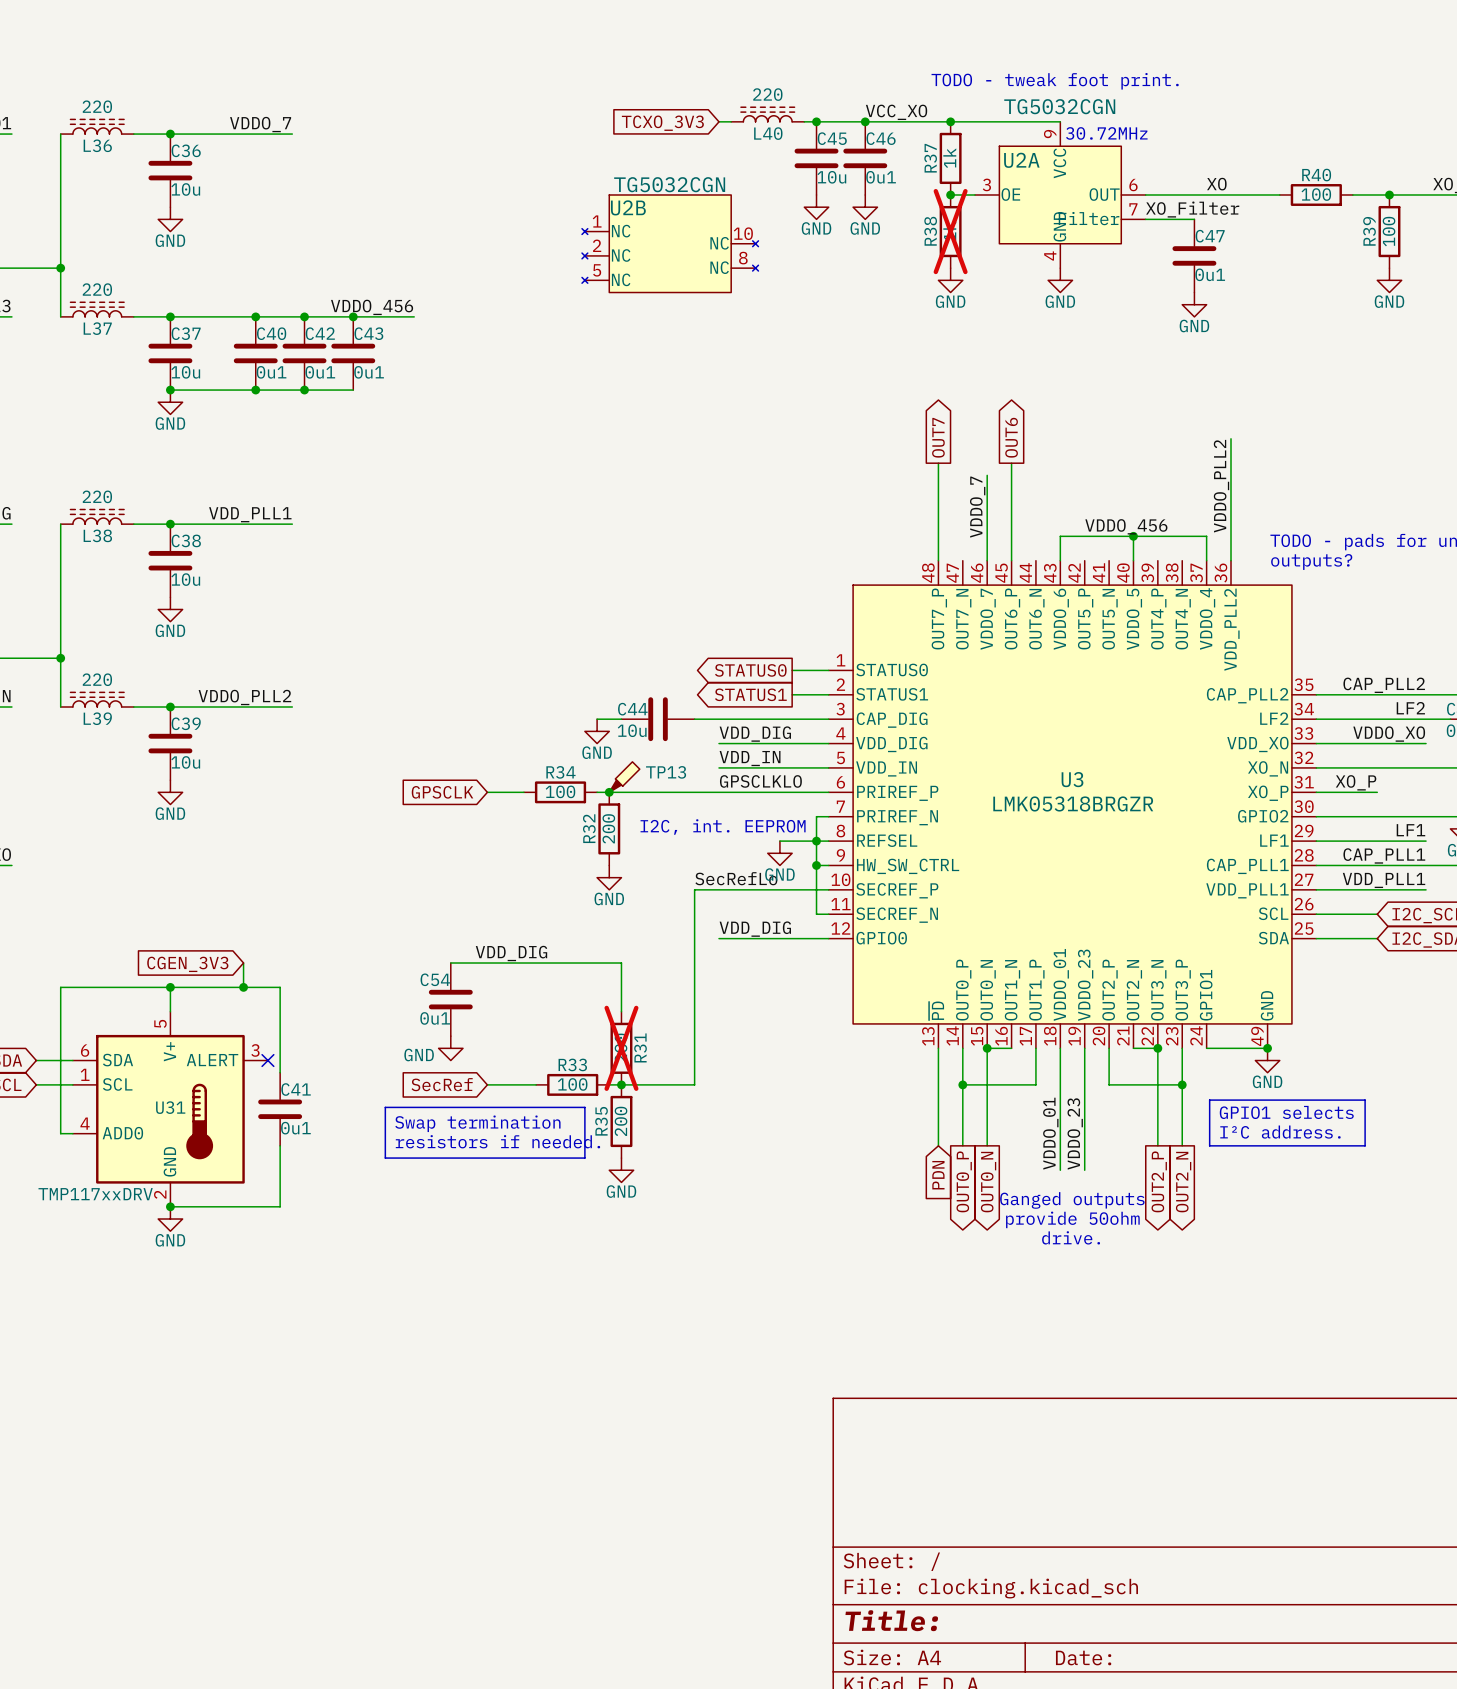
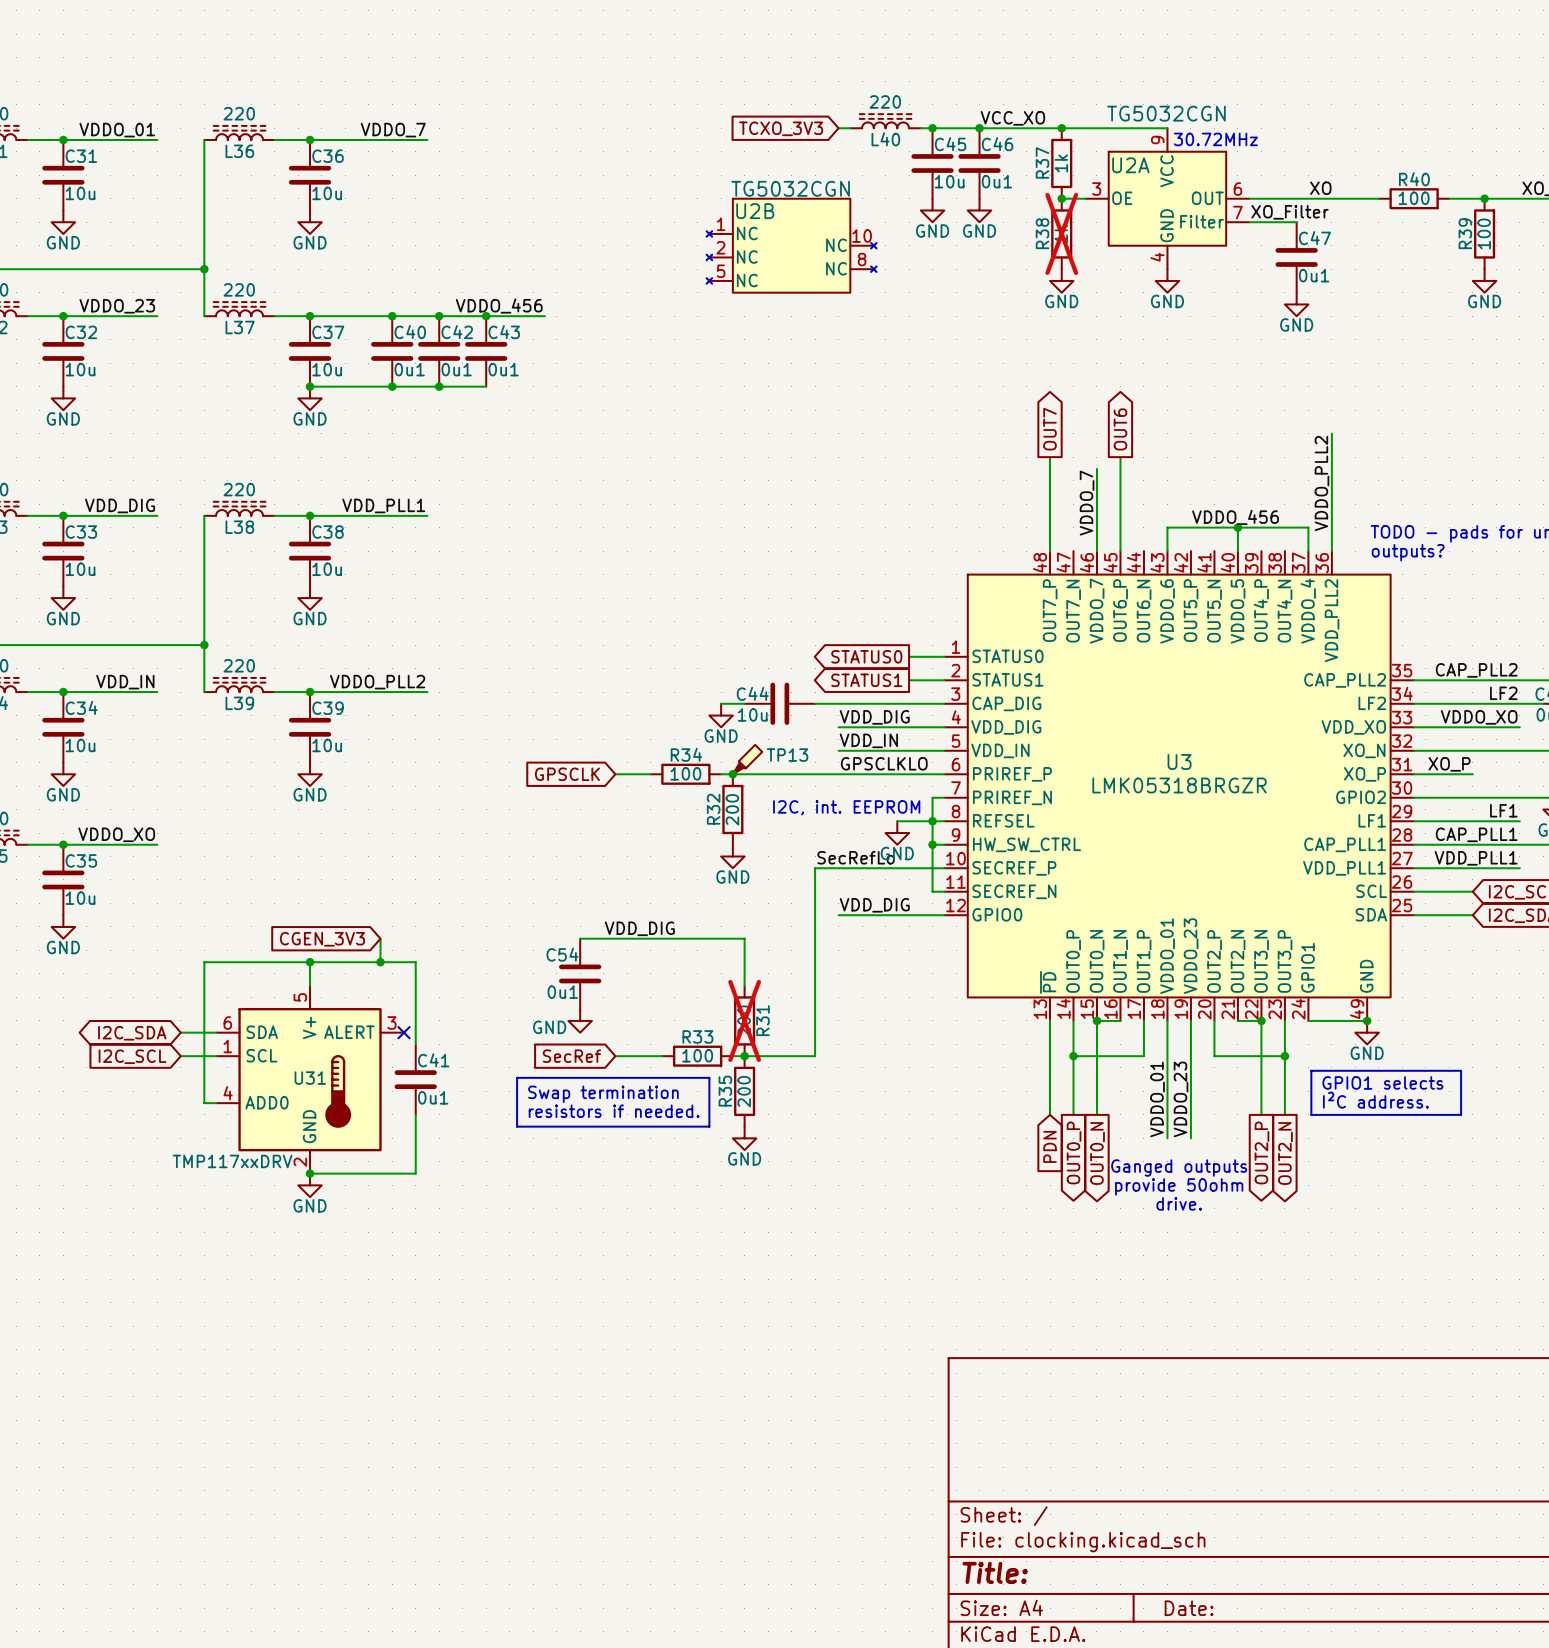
text: TODO - tweak foot print. (1055, 81) -> none

